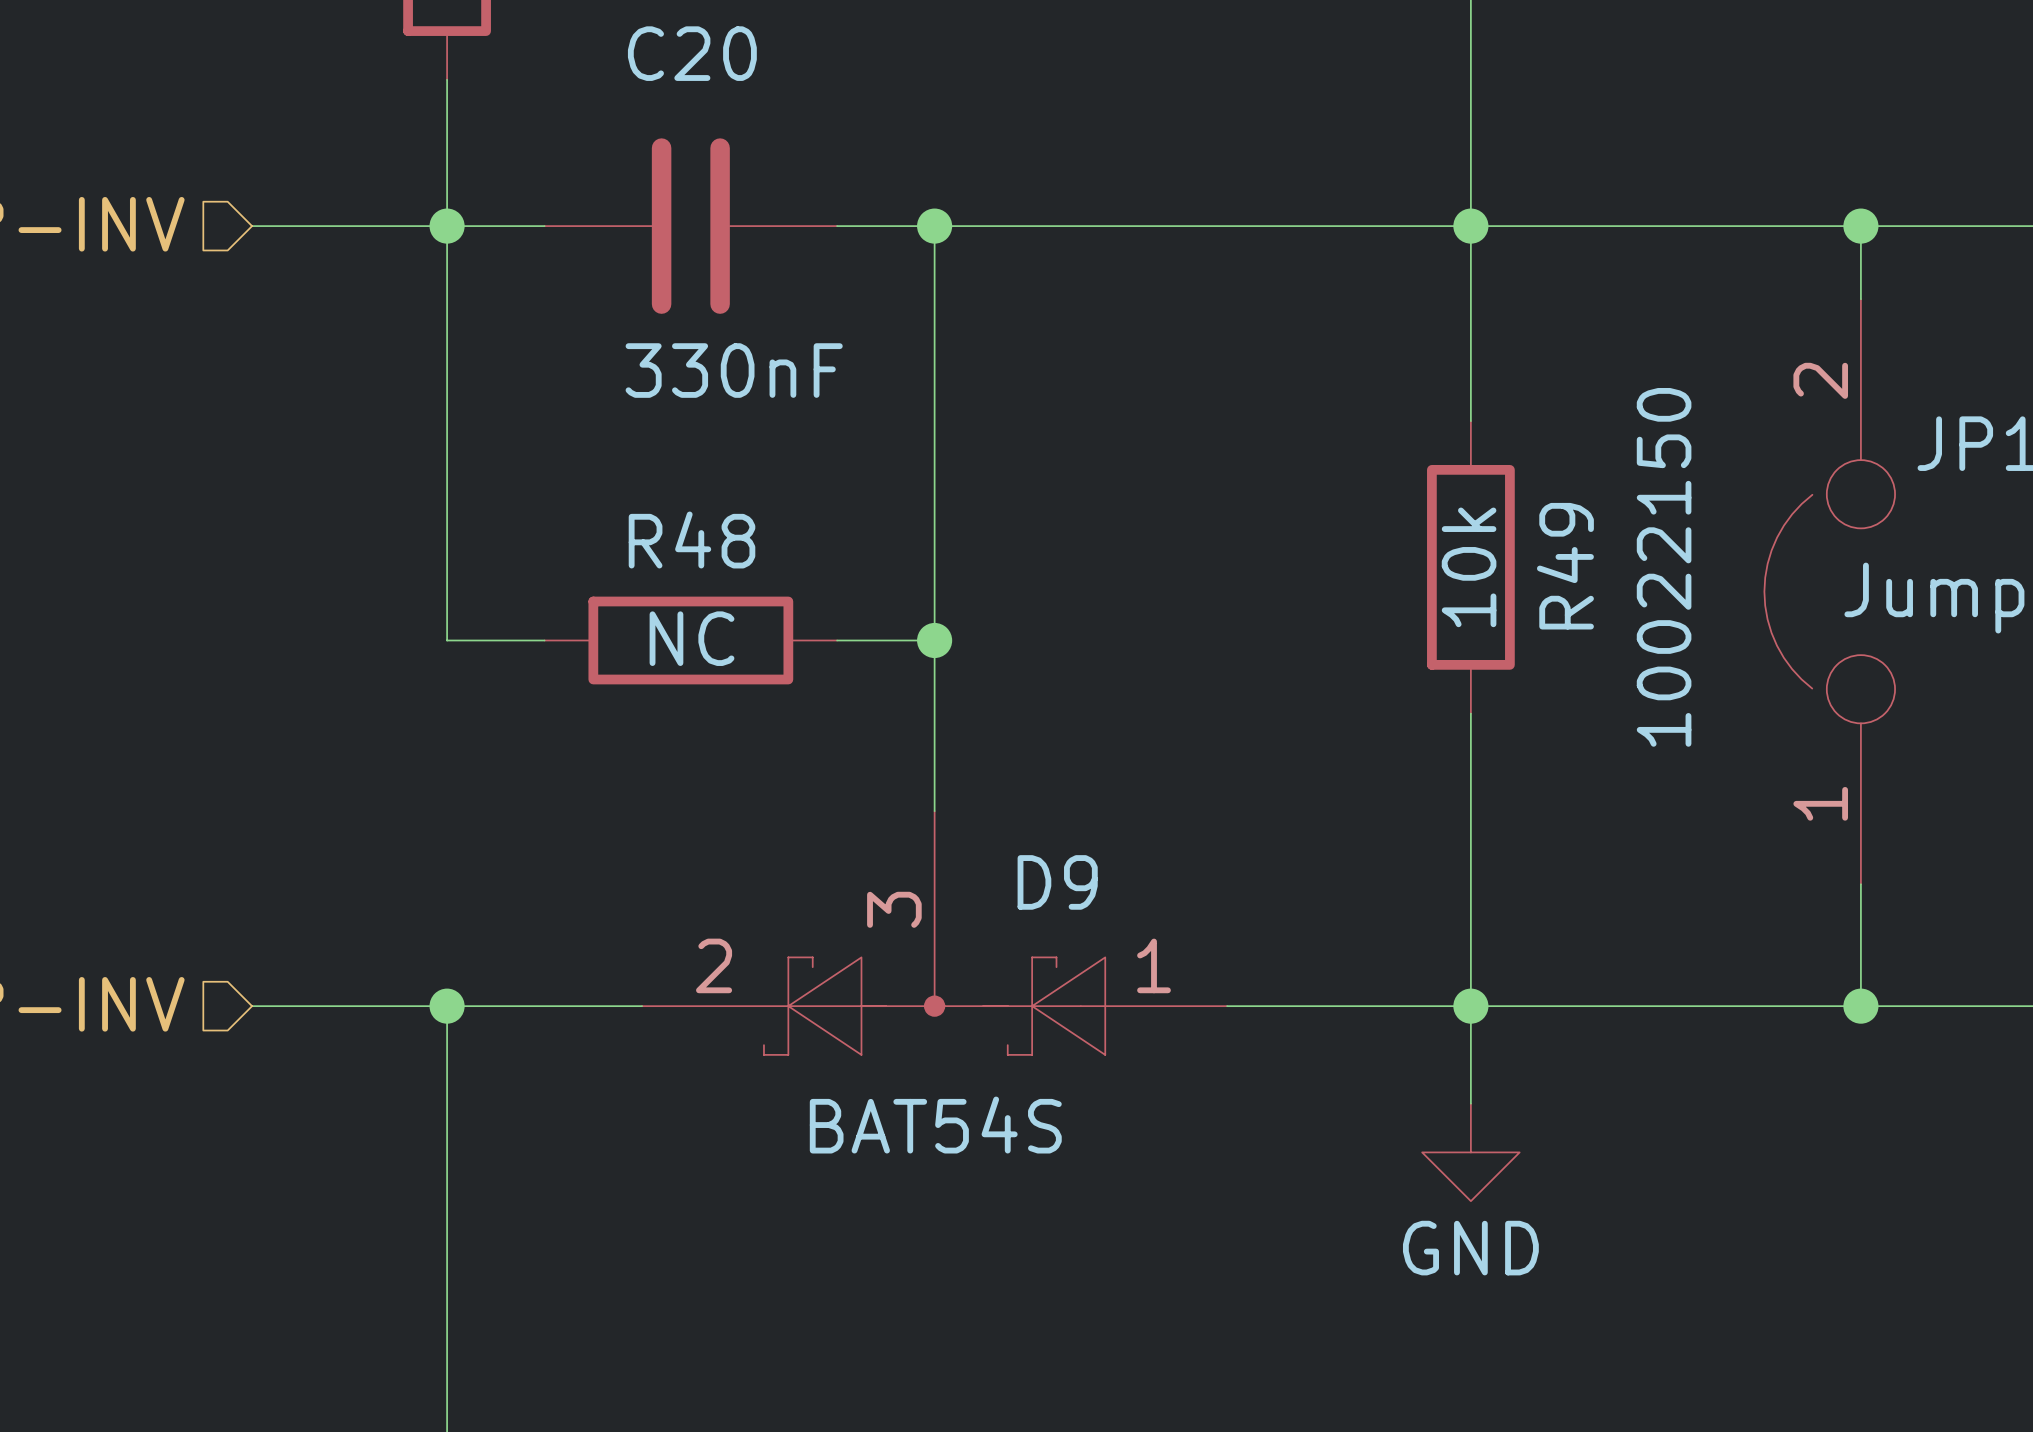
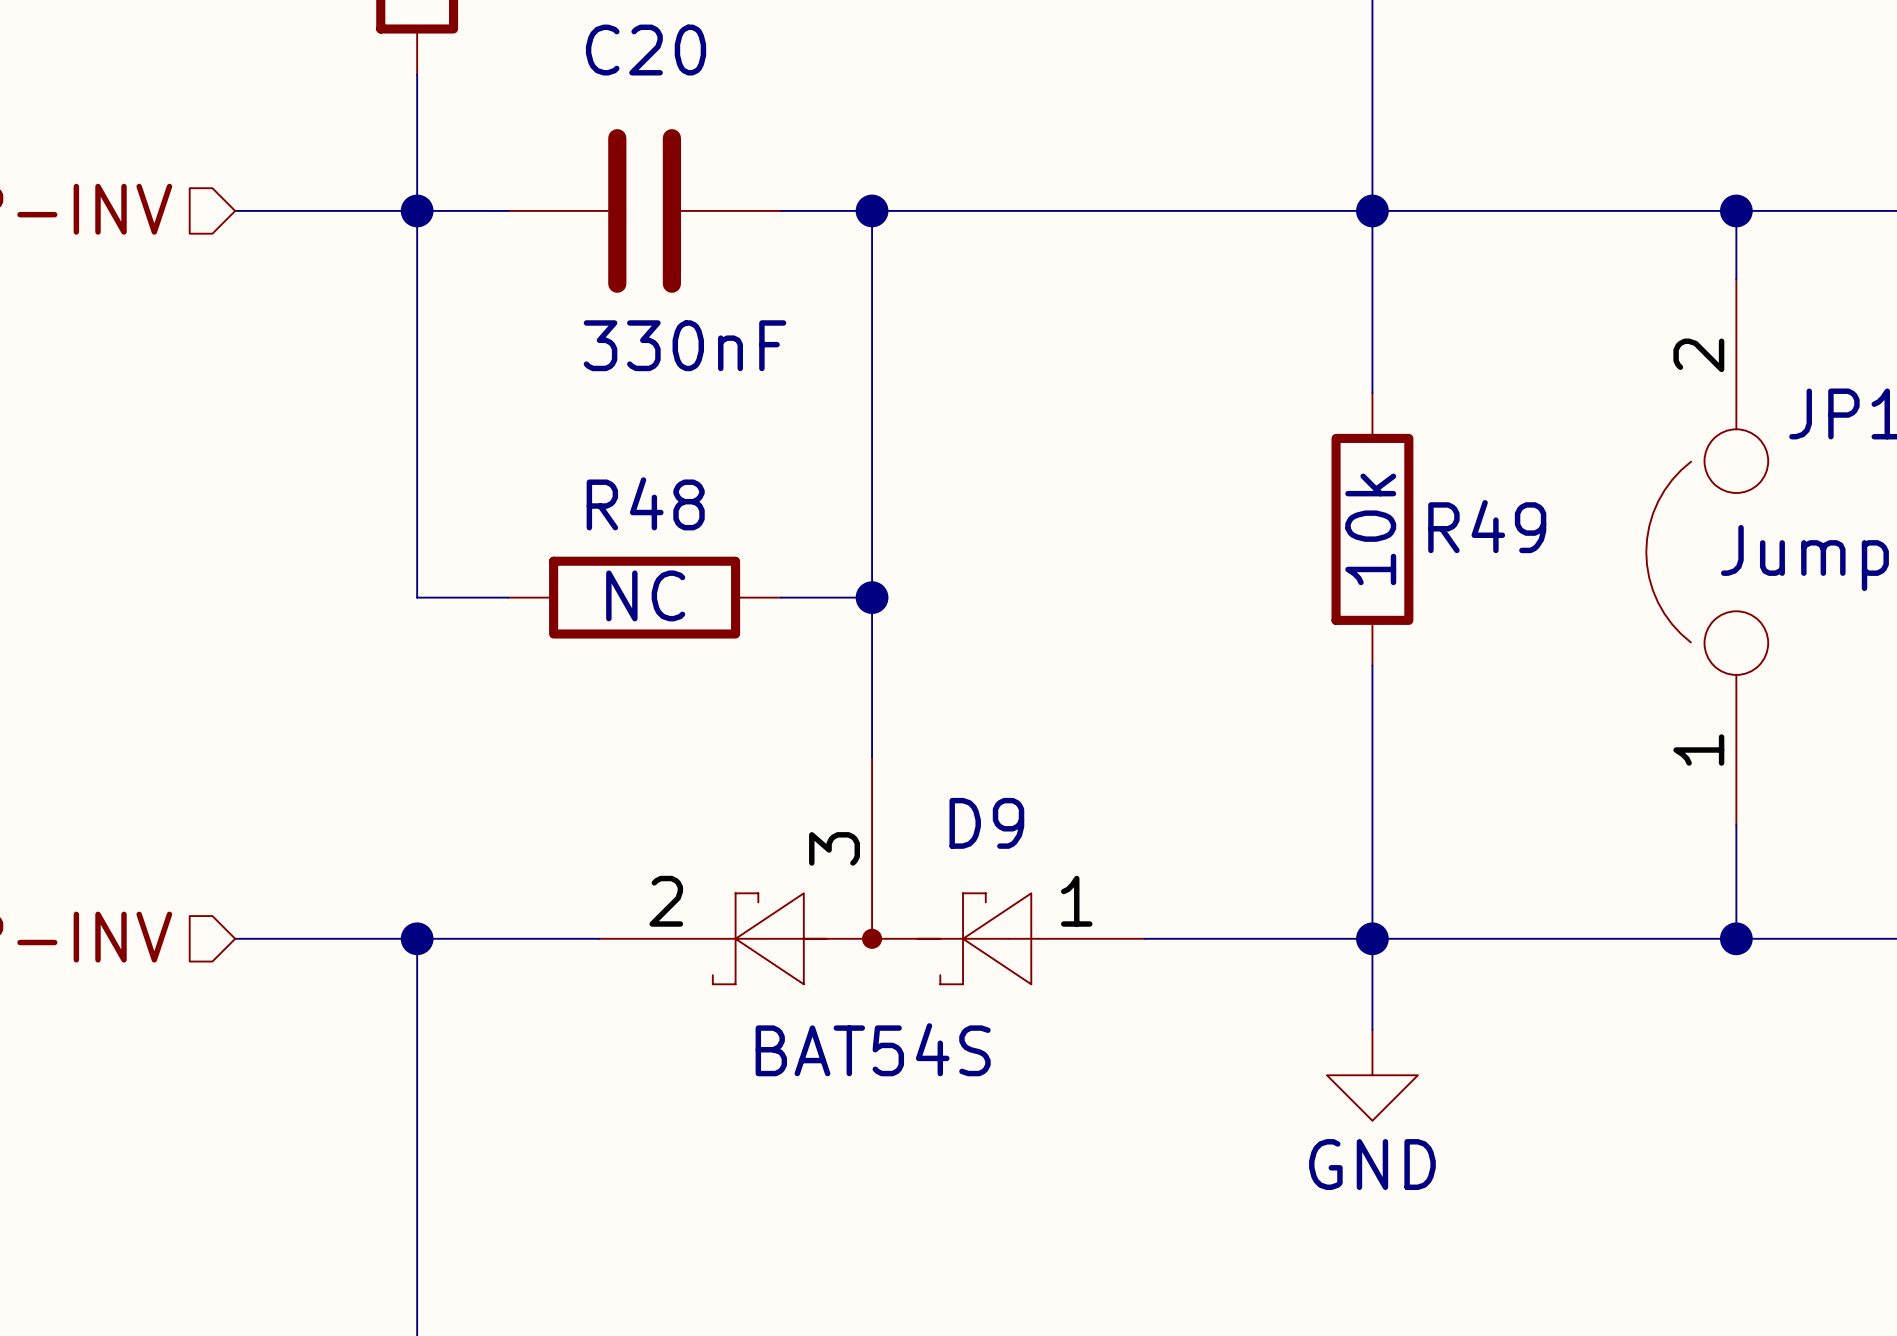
R49 name rotation: 0° (1565, 566) -> 90° clockwise (1487, 526)
R49 text: 10022150 (1664, 567) -> none

